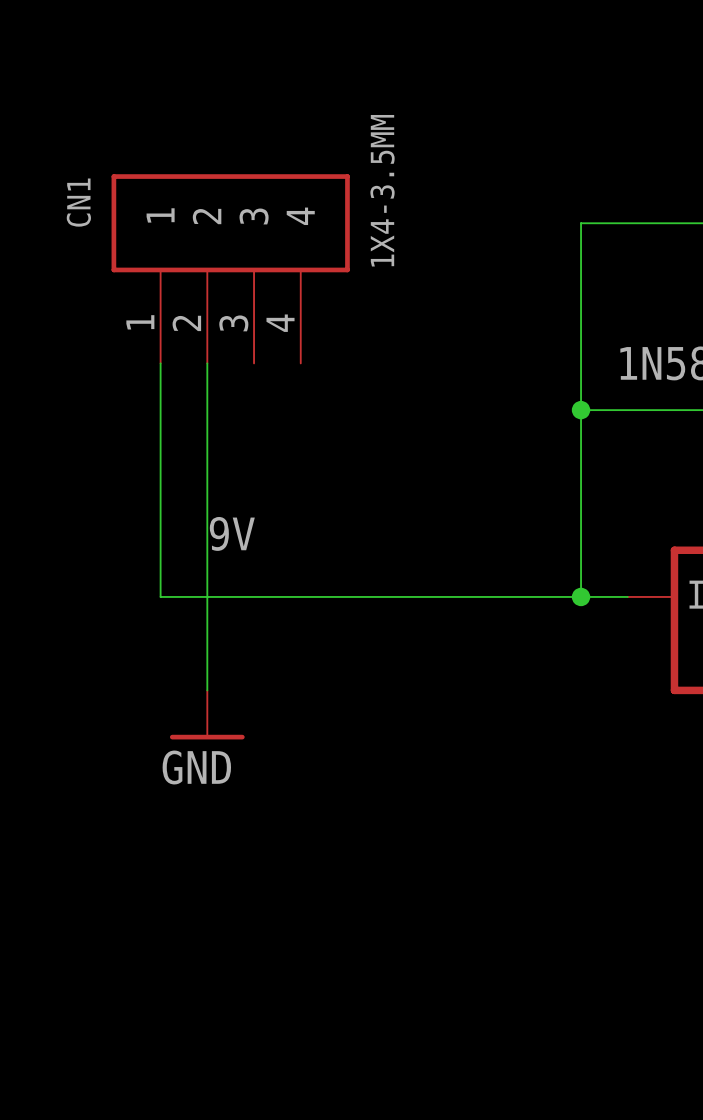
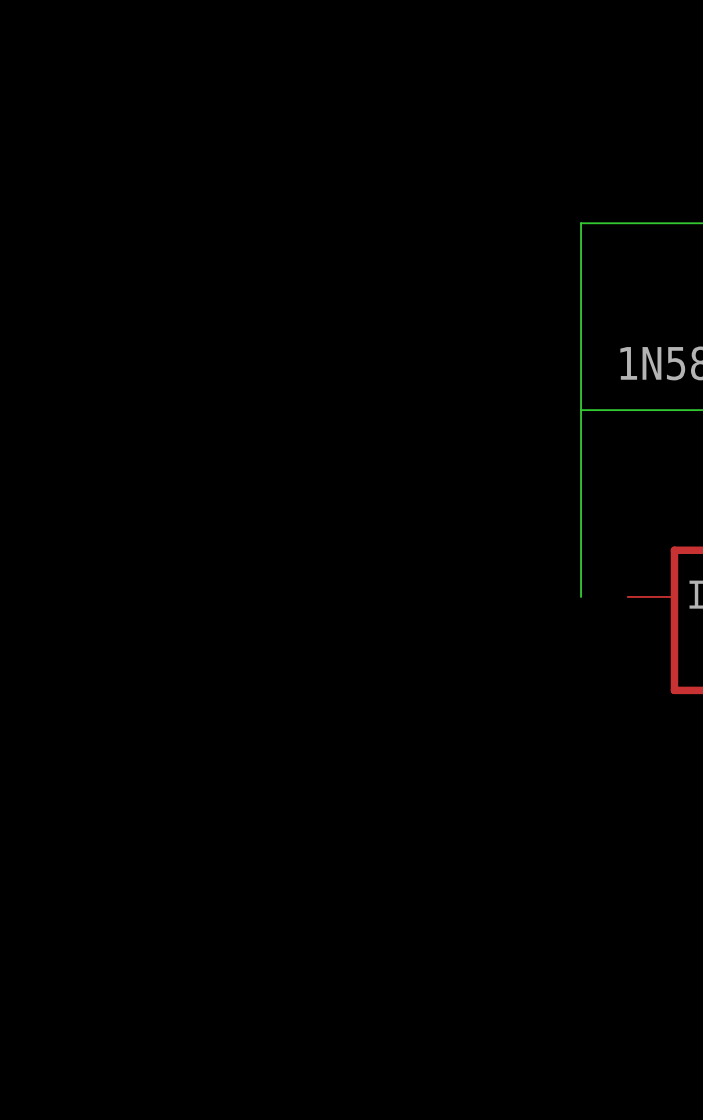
CN1: 1X4-3.5MM (230, 268) -> none
wire: (160, 363) (160, 596) (627, 596) -> none
wire: (207, 363) (207, 690) -> none
junction: (581, 410) -> none
label: 9V (232, 533) -> none
junction: (581, 596) -> none
power symbol: GND (207, 714) -> none

